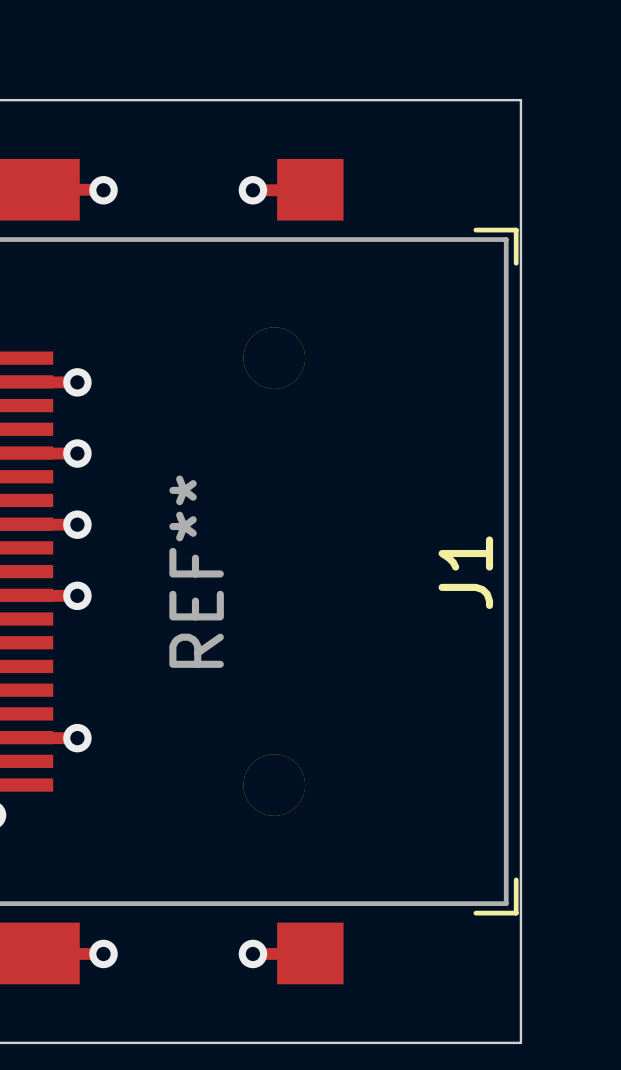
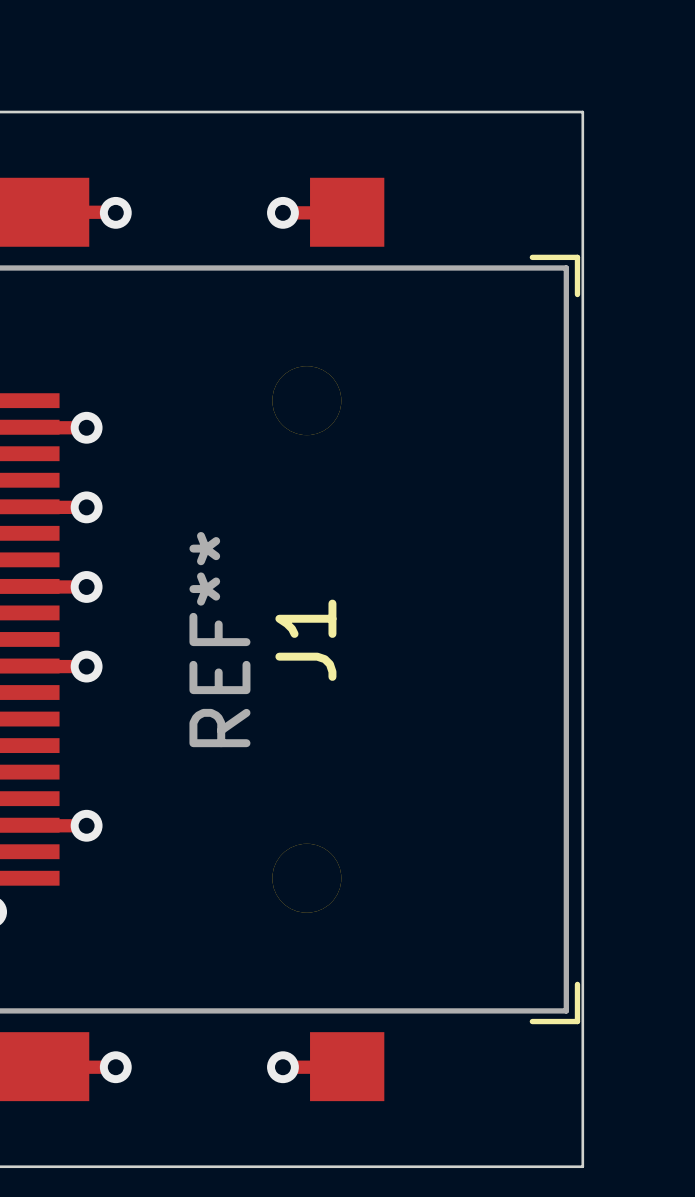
J1 name position: J1 (465, 572) -> J1 (305, 640)

